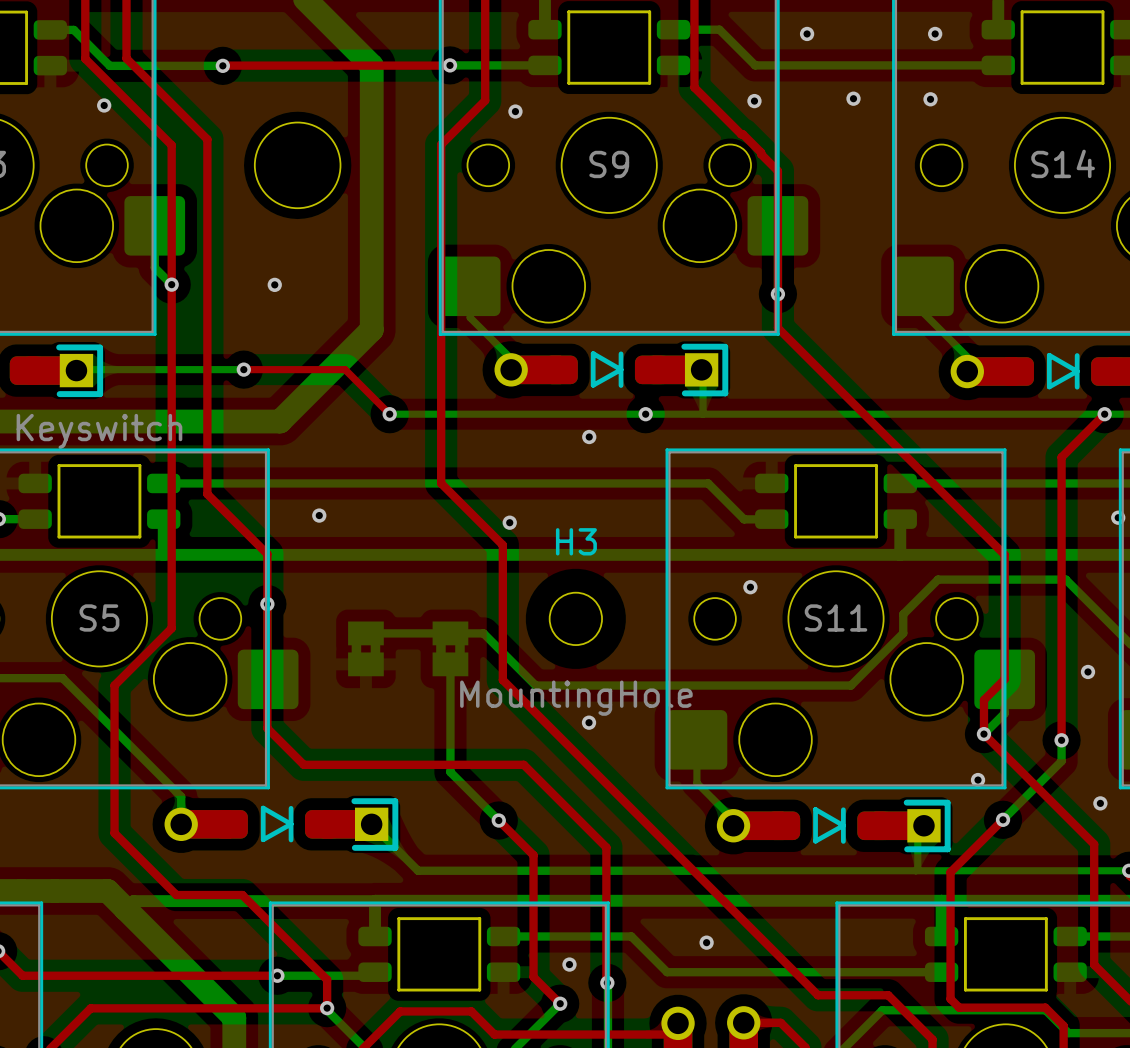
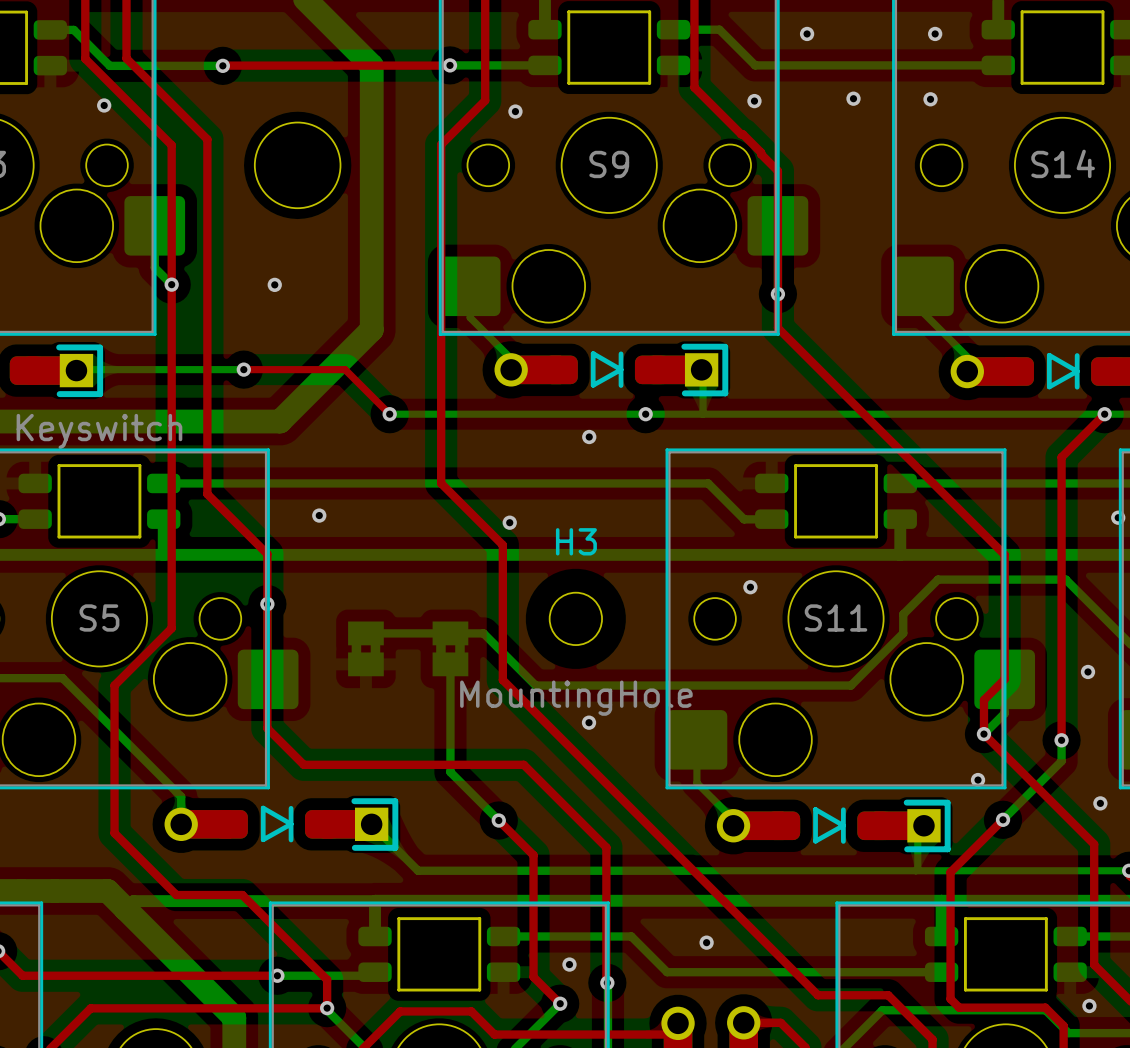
via: none -> (1089, 1005)

